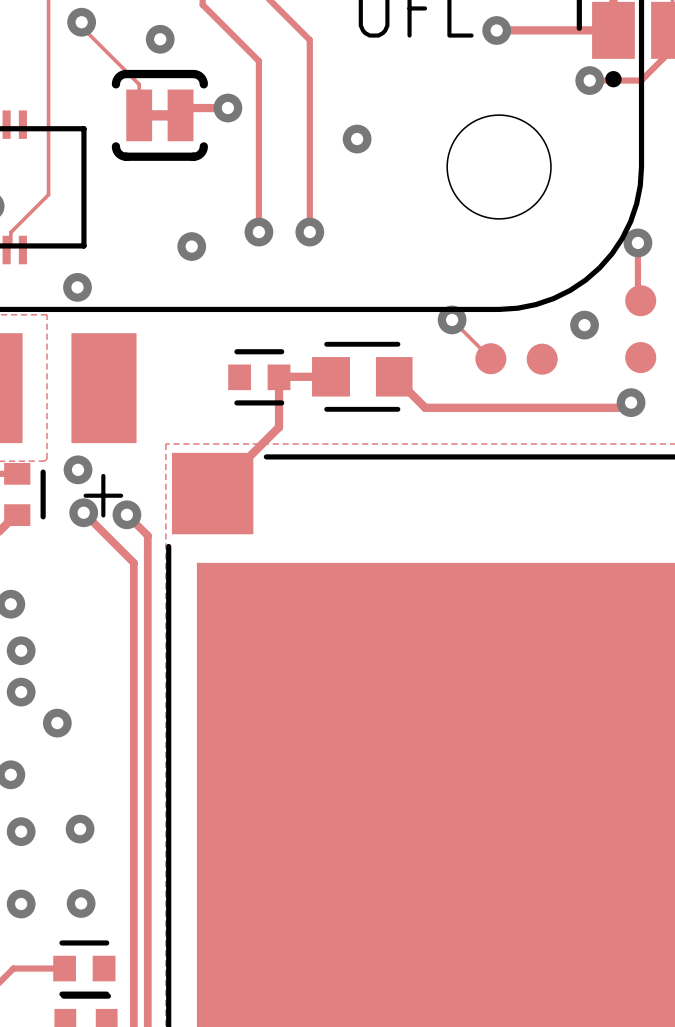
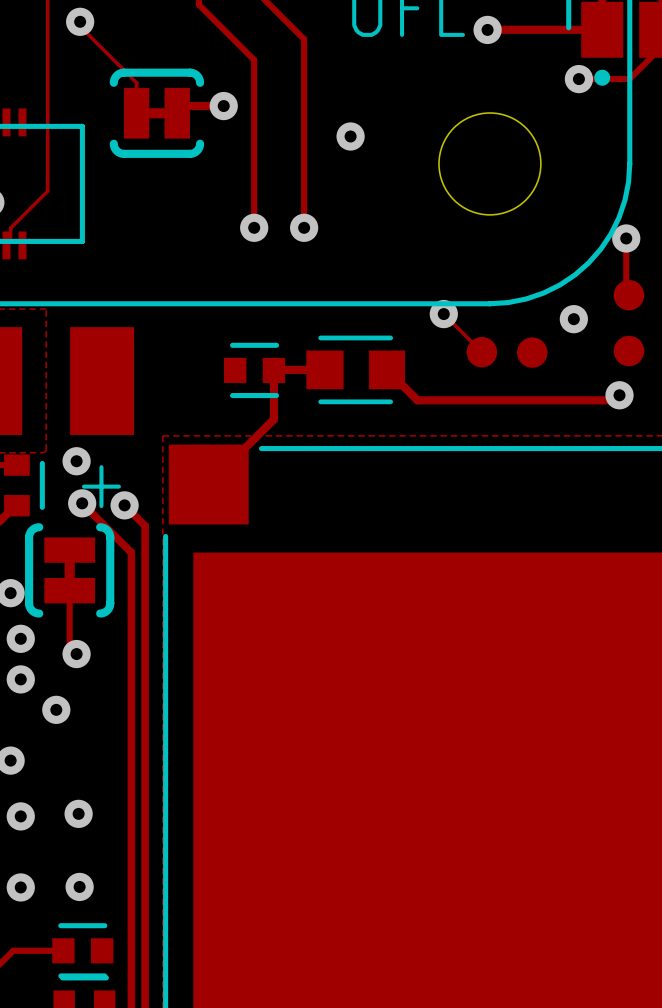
via: (160, 39) -> none
via: (191, 246) -> none
via: (77, 287) -> none
part: none -> (69, 570)
track: none -> (69, 590) (69, 647) (76, 654)
via: none -> (76, 654)

